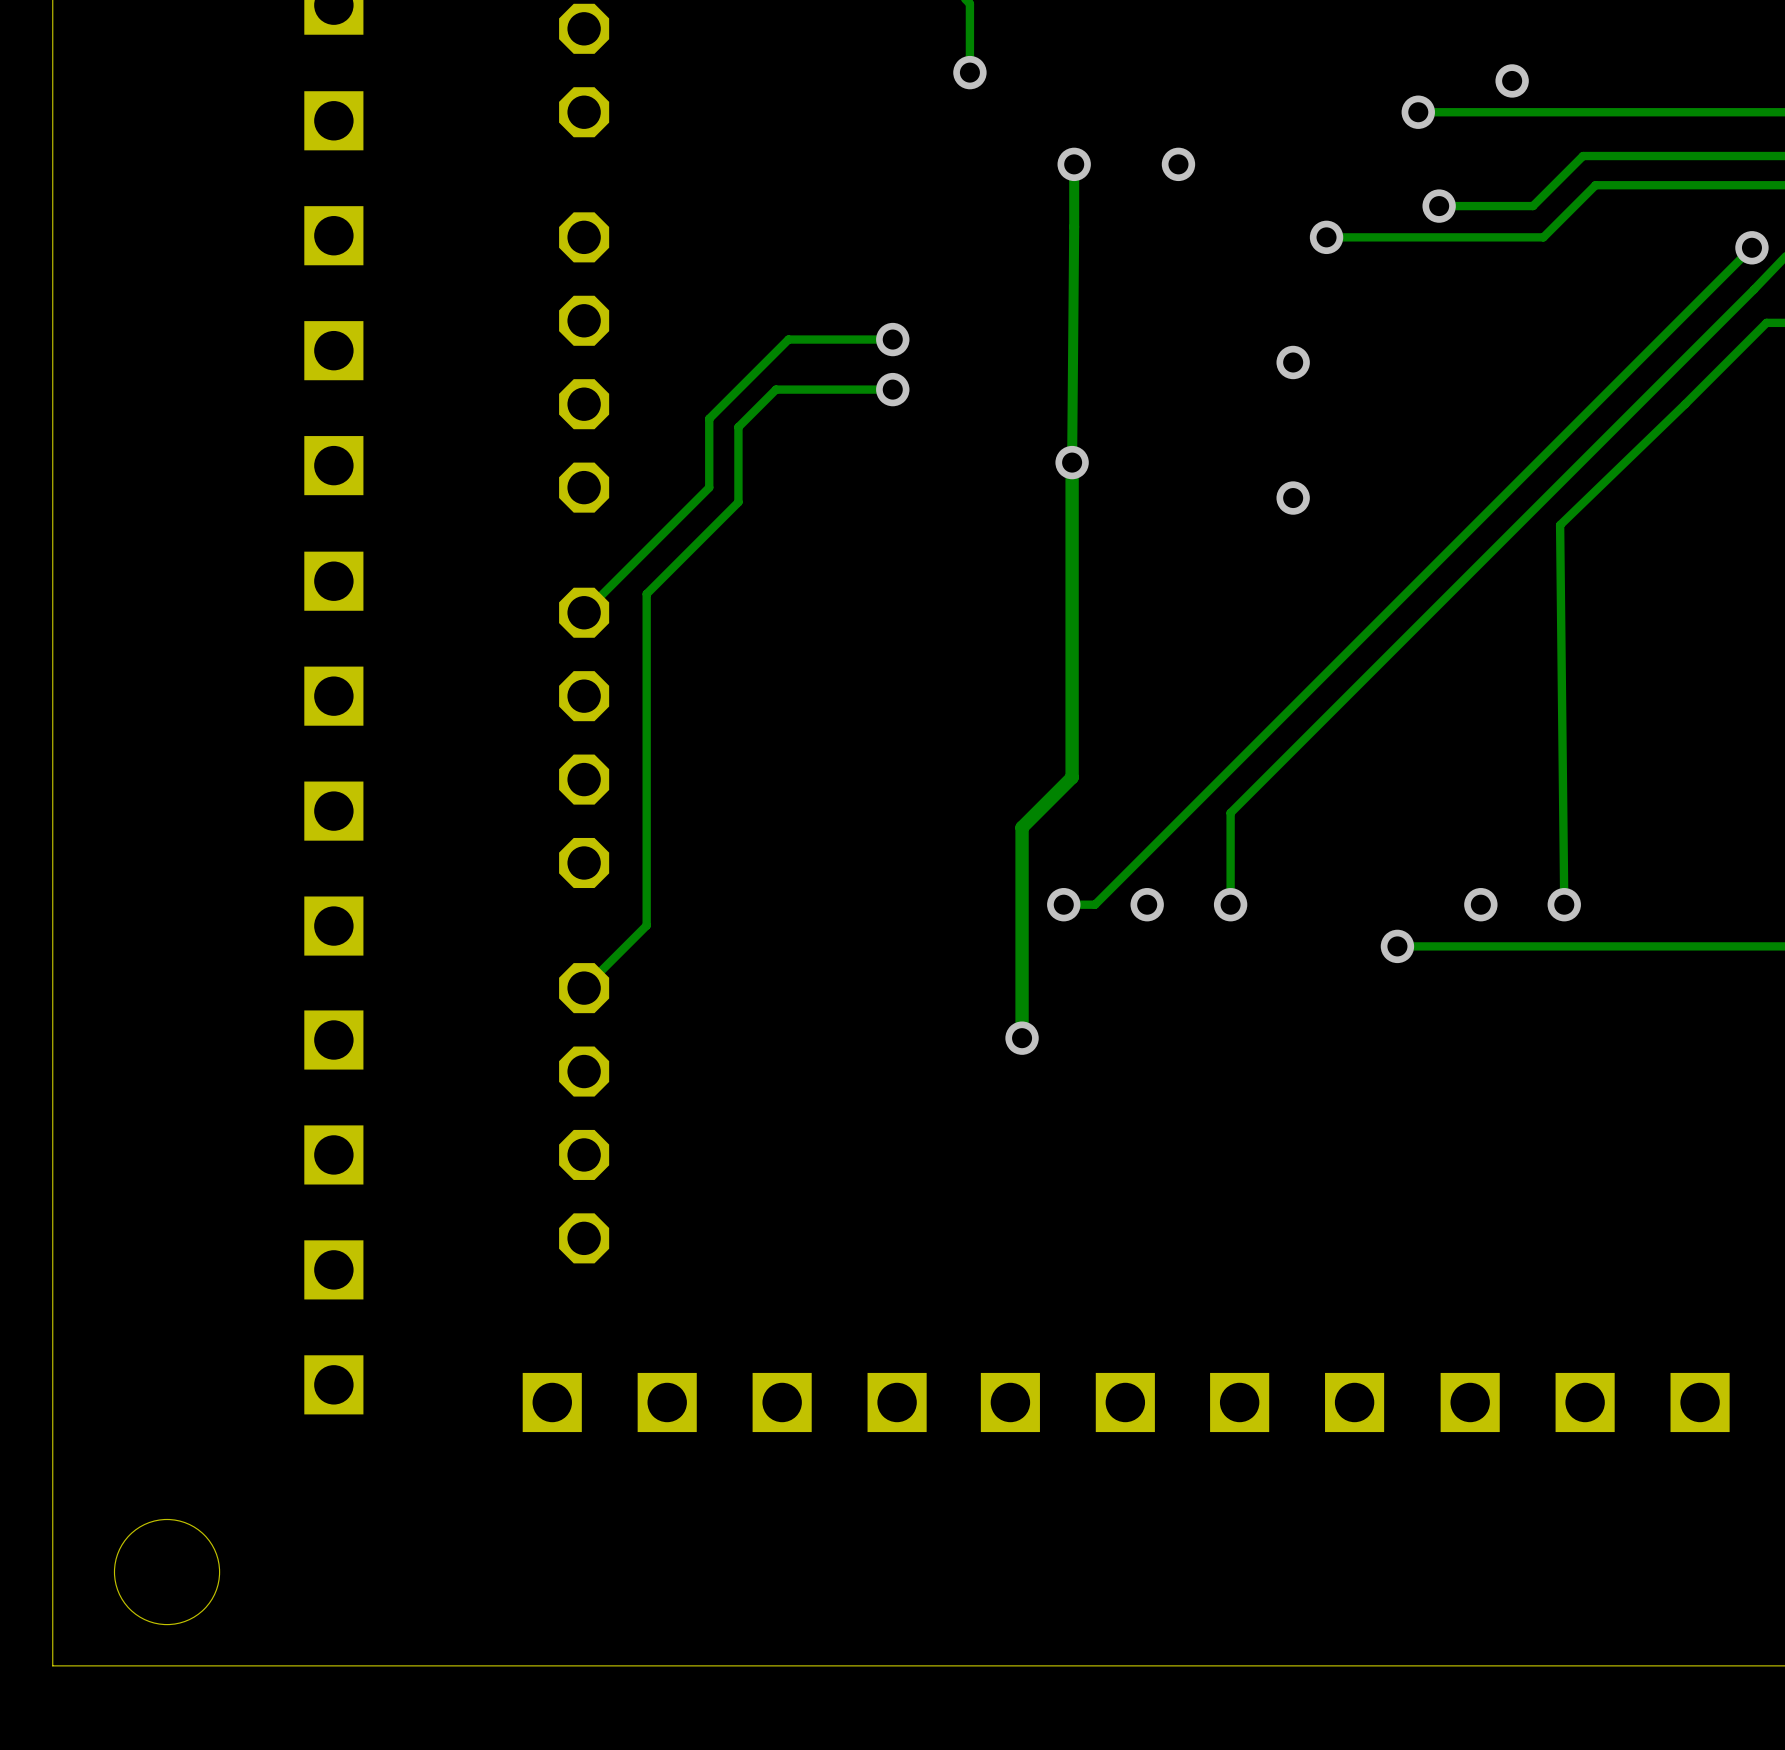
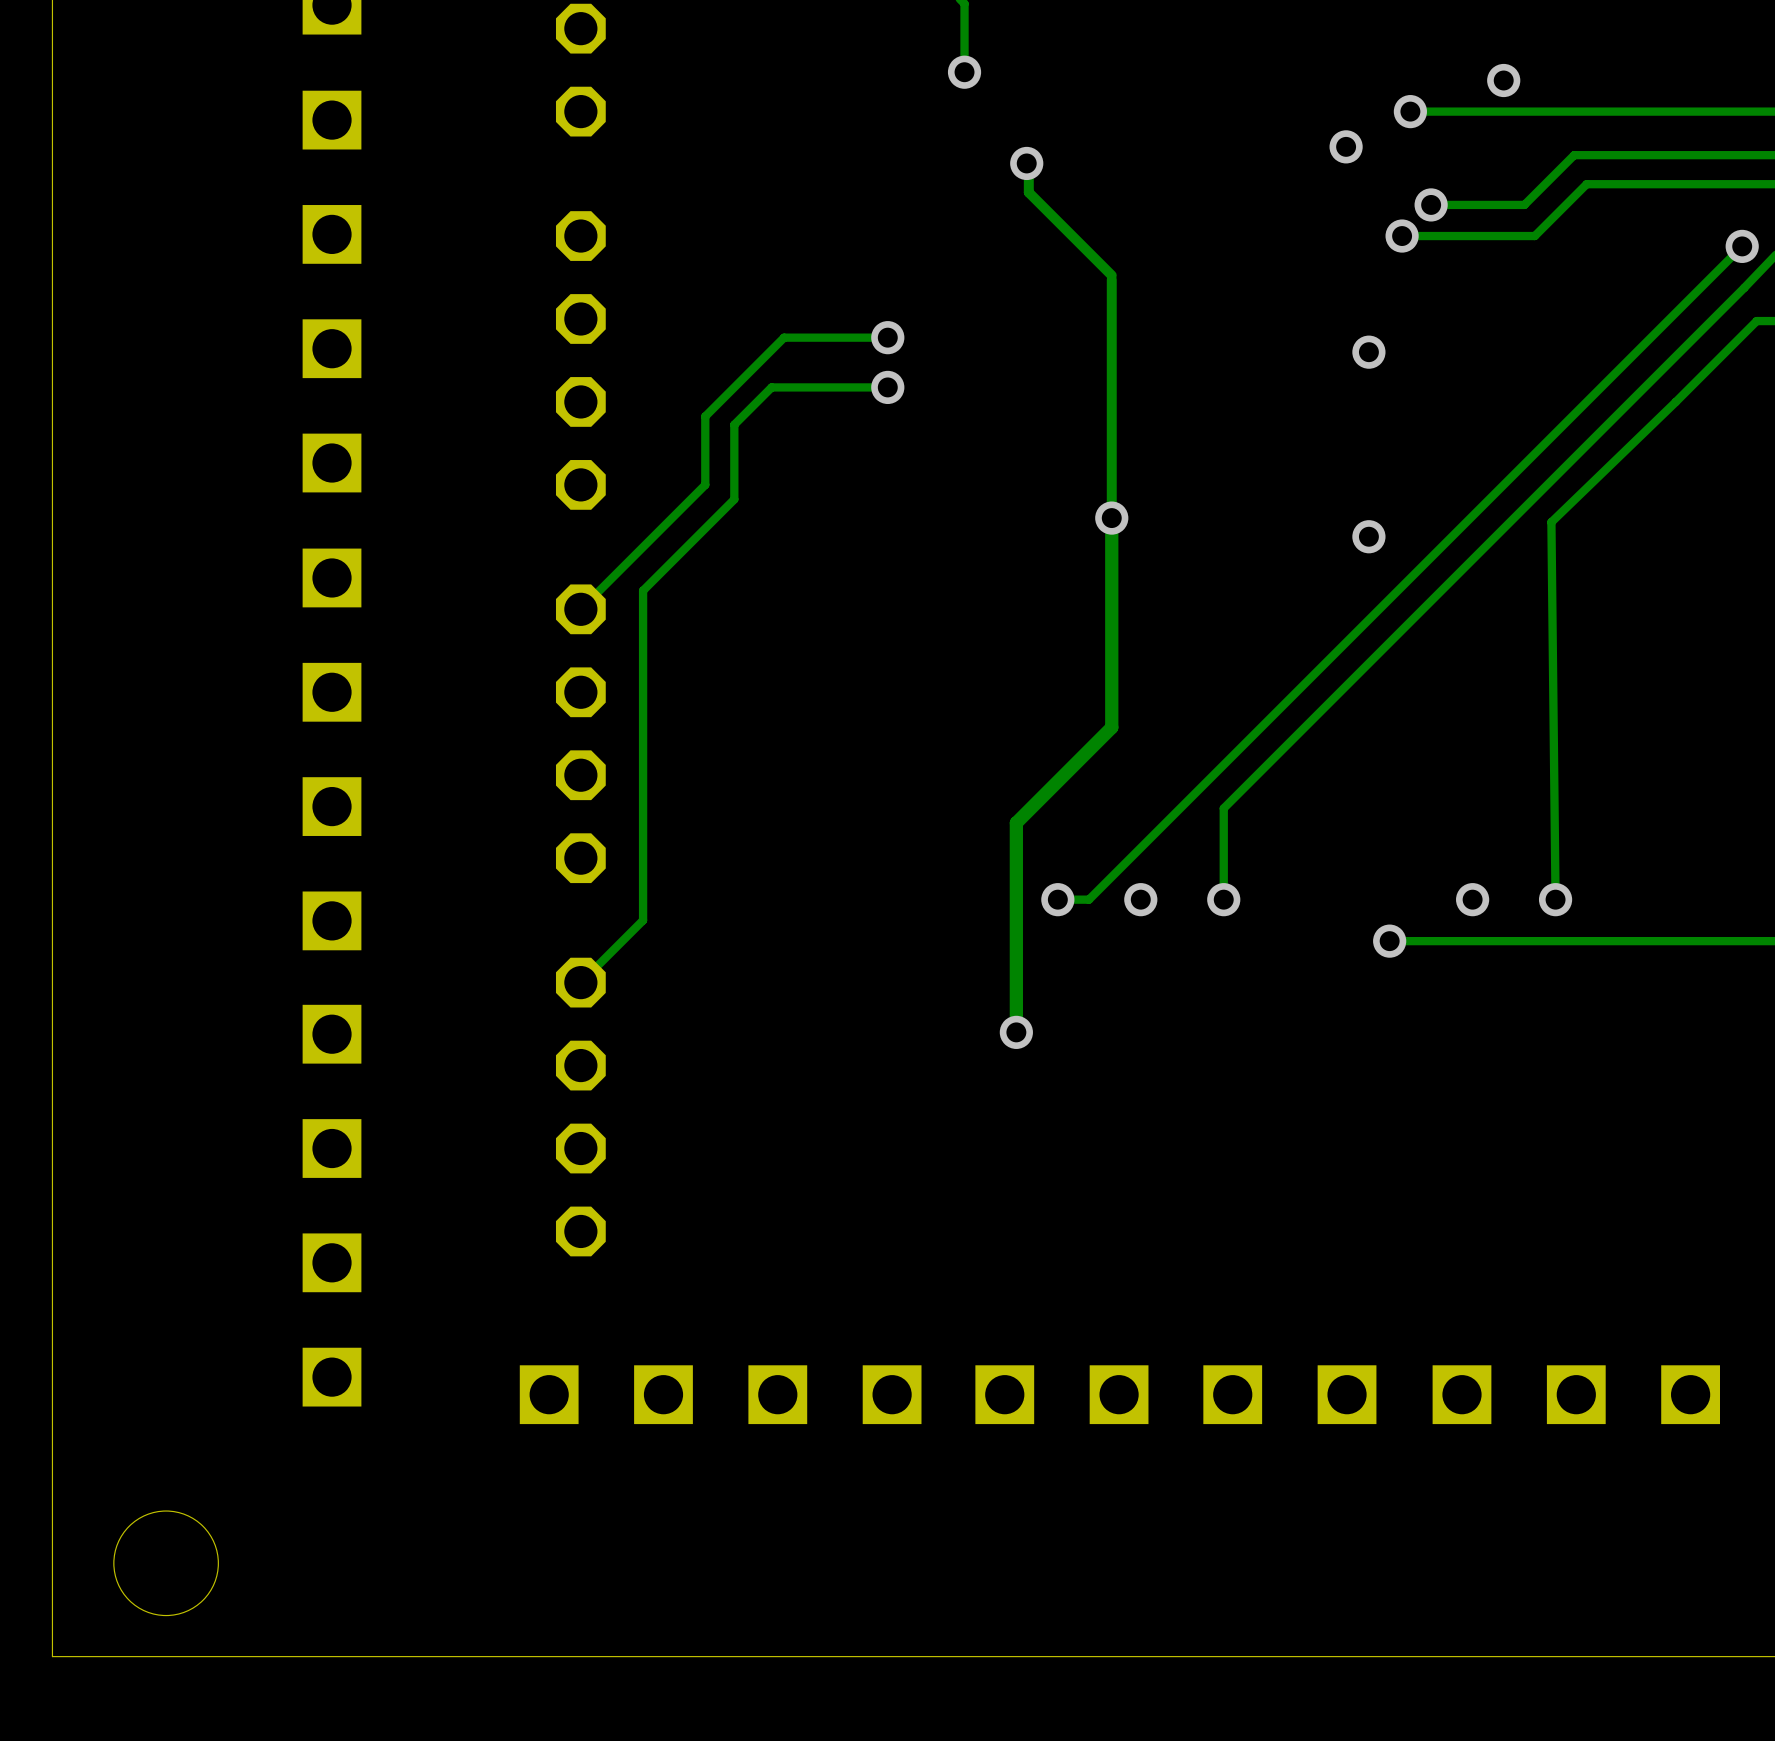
via: none -> (1346, 146)
track: (1074, 164) (1072, 777) -> (1026, 163) (1028, 165) (1028, 192) (1111, 275) (1111, 727) (1066, 773)
via position: (1074, 164) -> (1026, 163)
via: (1178, 164) -> none
via: (1326, 237) -> none
track: (1409, 237) (1326, 237) -> none
via: none -> (1402, 236)
via: none -> (1368, 352)
via: (1293, 362) -> none
via position: (1072, 462) -> (1111, 518)
via: (1293, 498) -> none
via: none -> (1368, 536)

